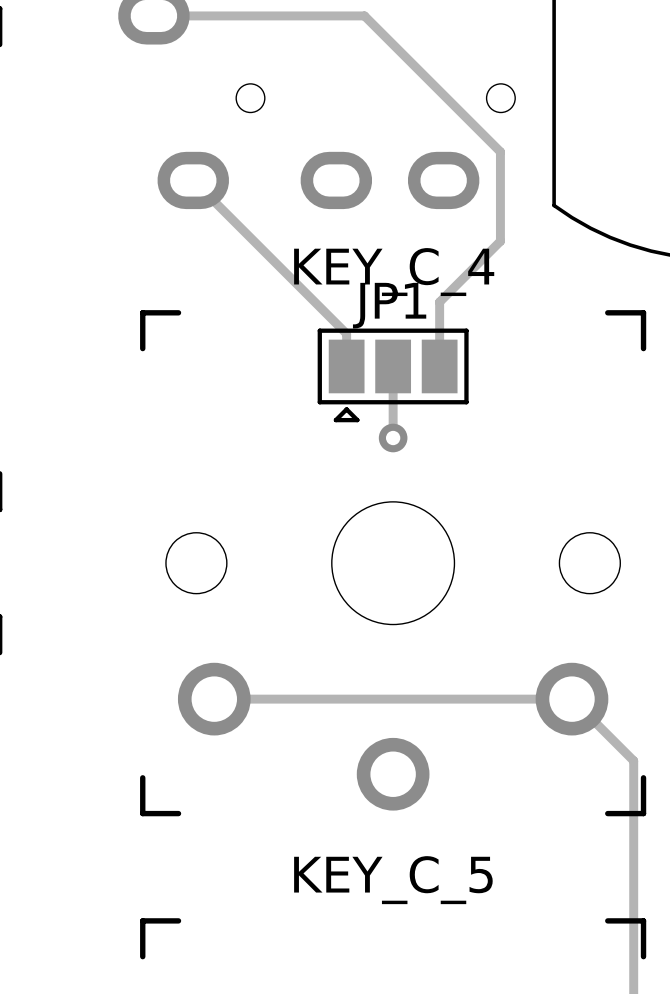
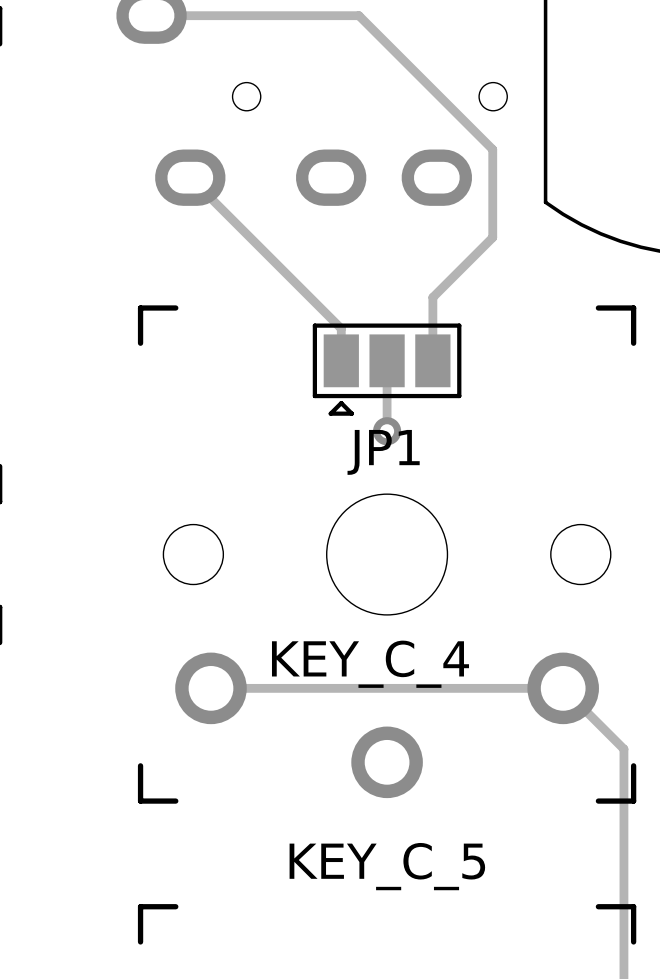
KEY_C_4 name position: KEY_C_4 (394, 272) -> KEY_C_4 (370, 664)
JP1 name position: JP1 (389, 305) -> JP1 (383, 452)

